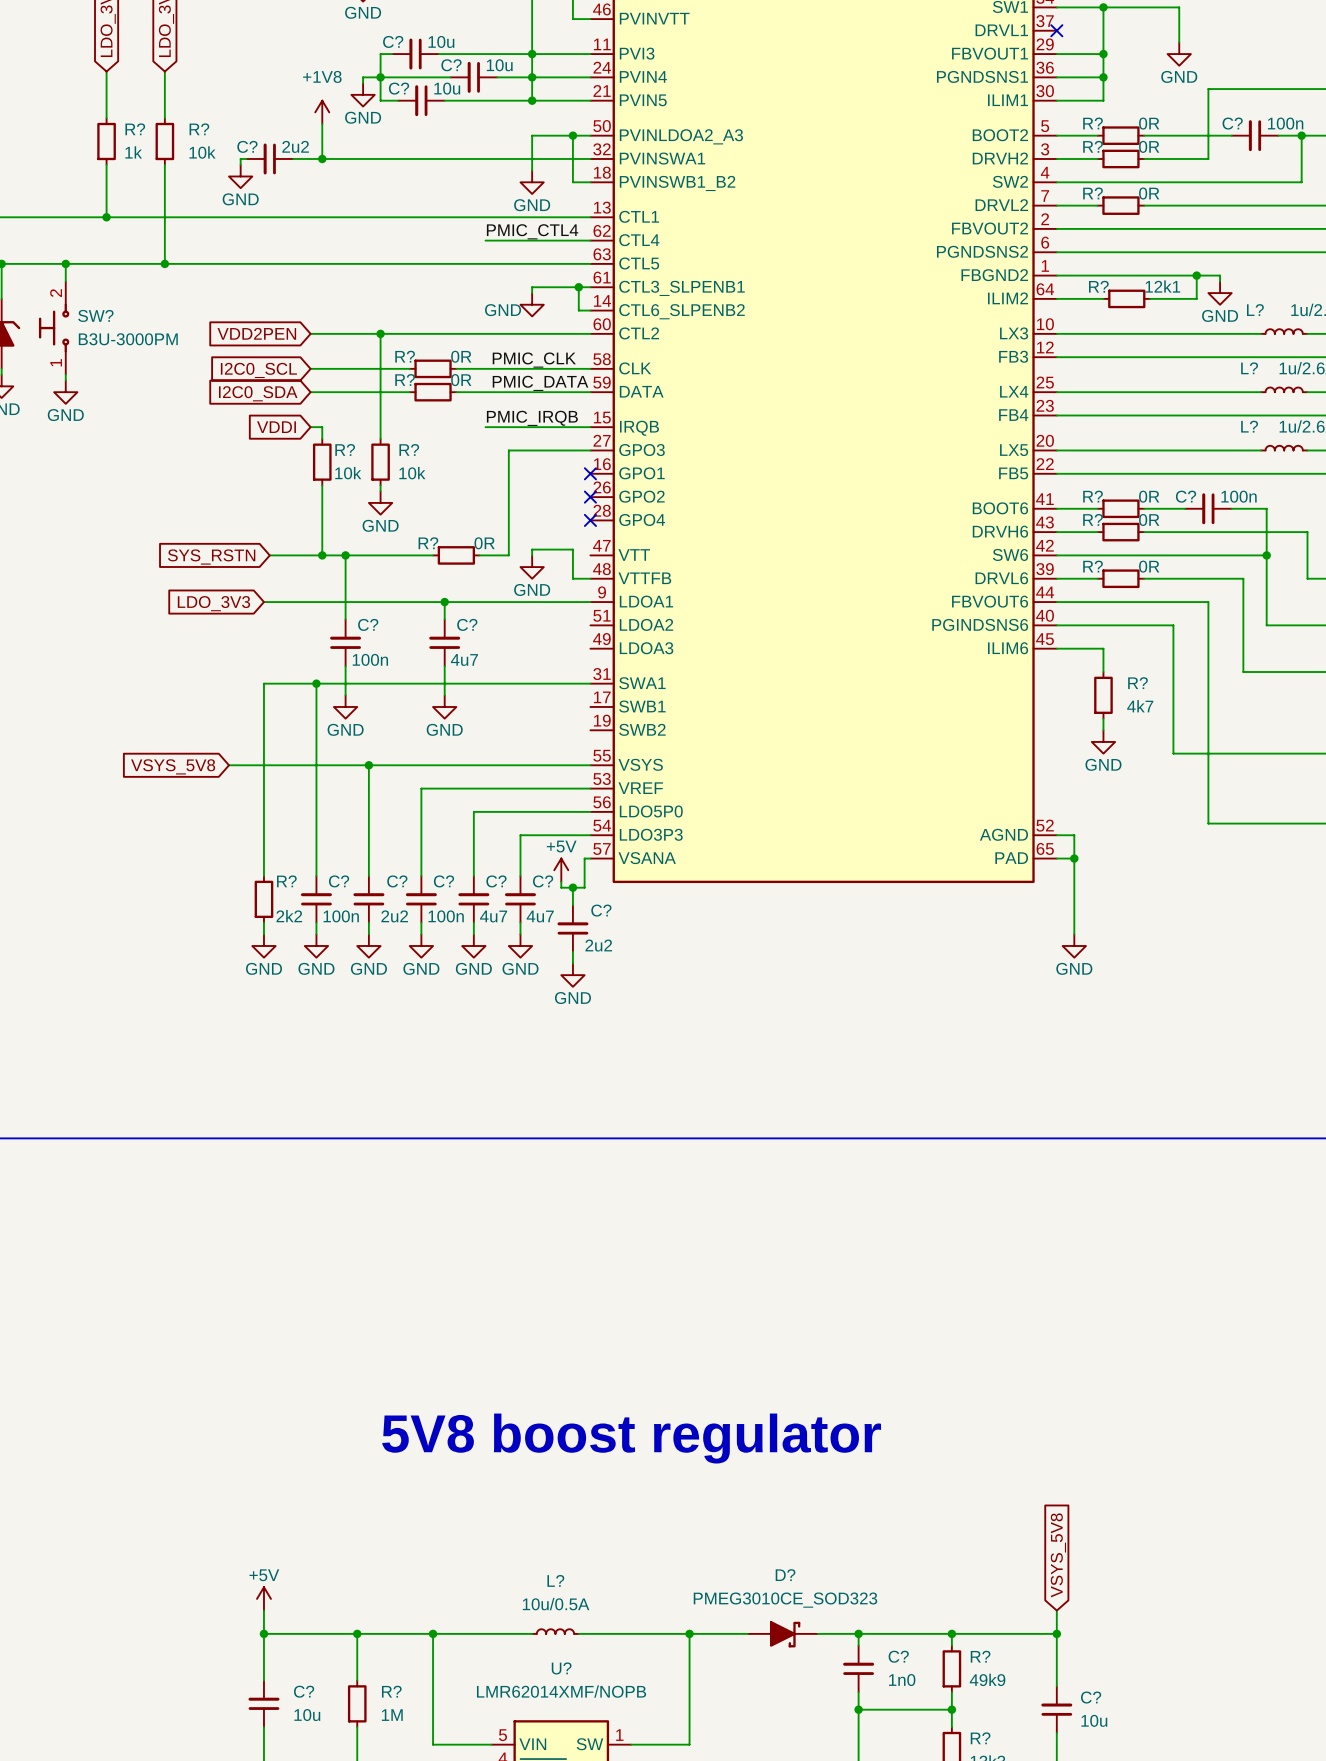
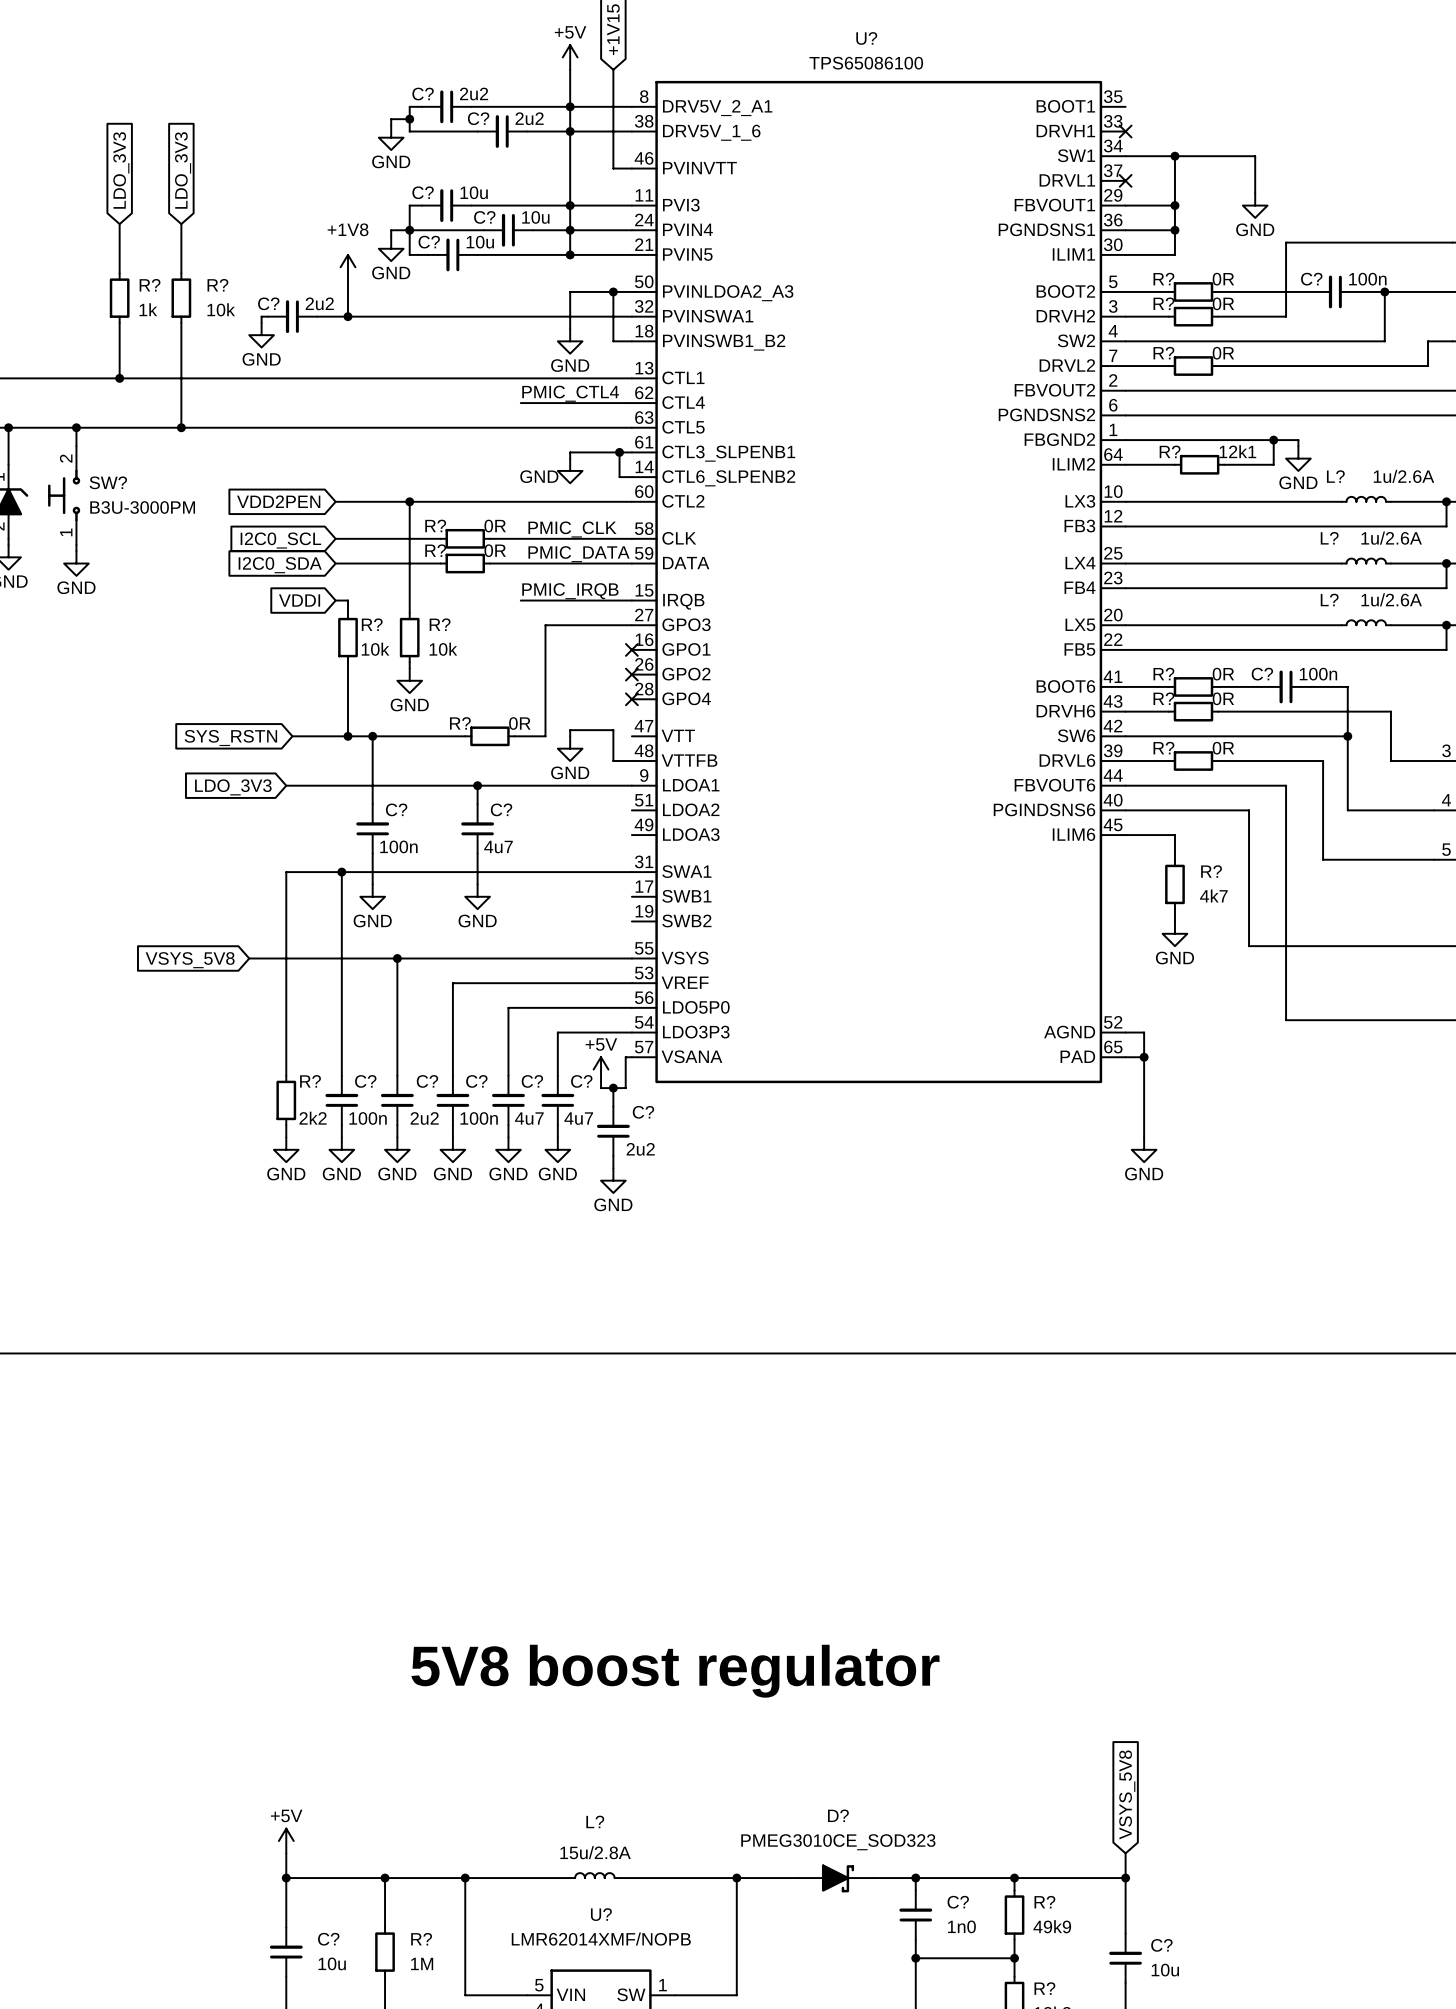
L? text: 10u/0.5A (556, 1604) -> 15u/2.8A (595, 1852)

